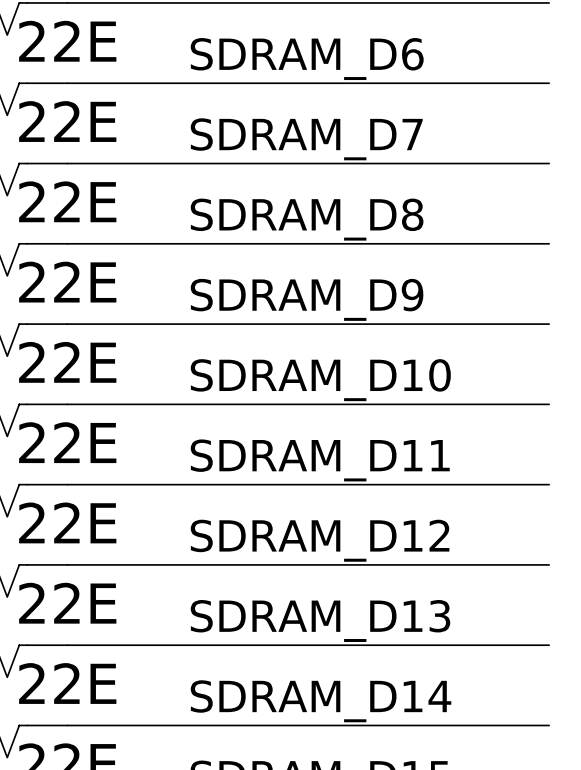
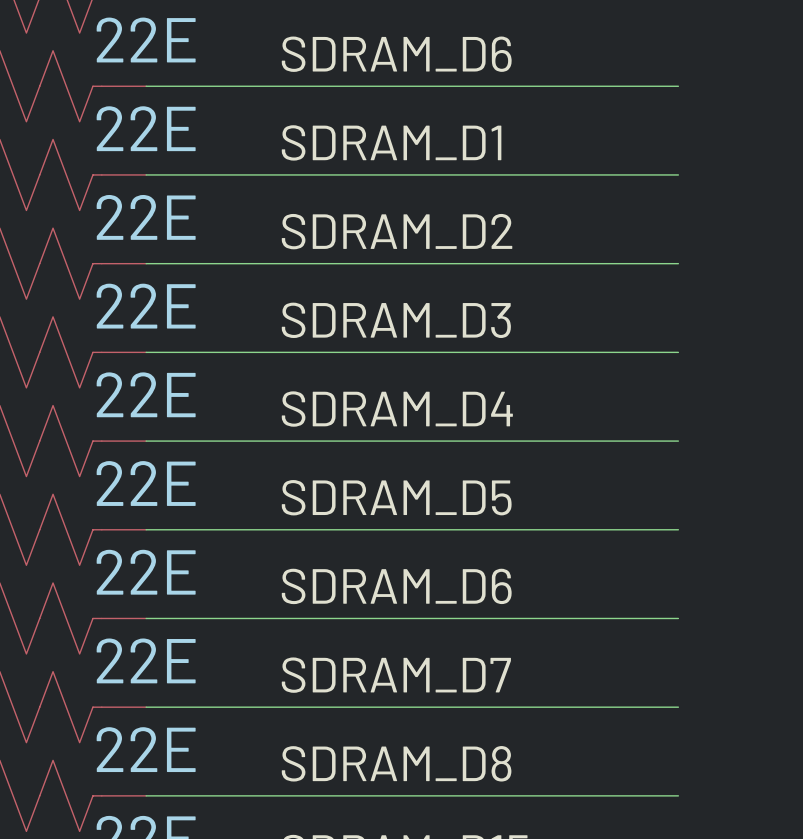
label: SDRAM_D7 (306, 139) -> SDRAM_D1 (391, 142)
label: SDRAM_D8 (307, 219) -> SDRAM_D2 (397, 231)
label: SDRAM_D9 (307, 299) -> SDRAM_D3 (396, 320)
label: SDRAM_D10 (320, 380) -> SDRAM_D4 (397, 409)
label: SDRAM_D11 (320, 460) -> SDRAM_D5 (396, 497)
label: SDRAM_D12 (320, 540) -> SDRAM_D6 (396, 586)
label: SDRAM_D13 (320, 620) -> SDRAM_D7 (396, 675)
label: SDRAM_D14 (321, 701) -> SDRAM_D8 (396, 763)

